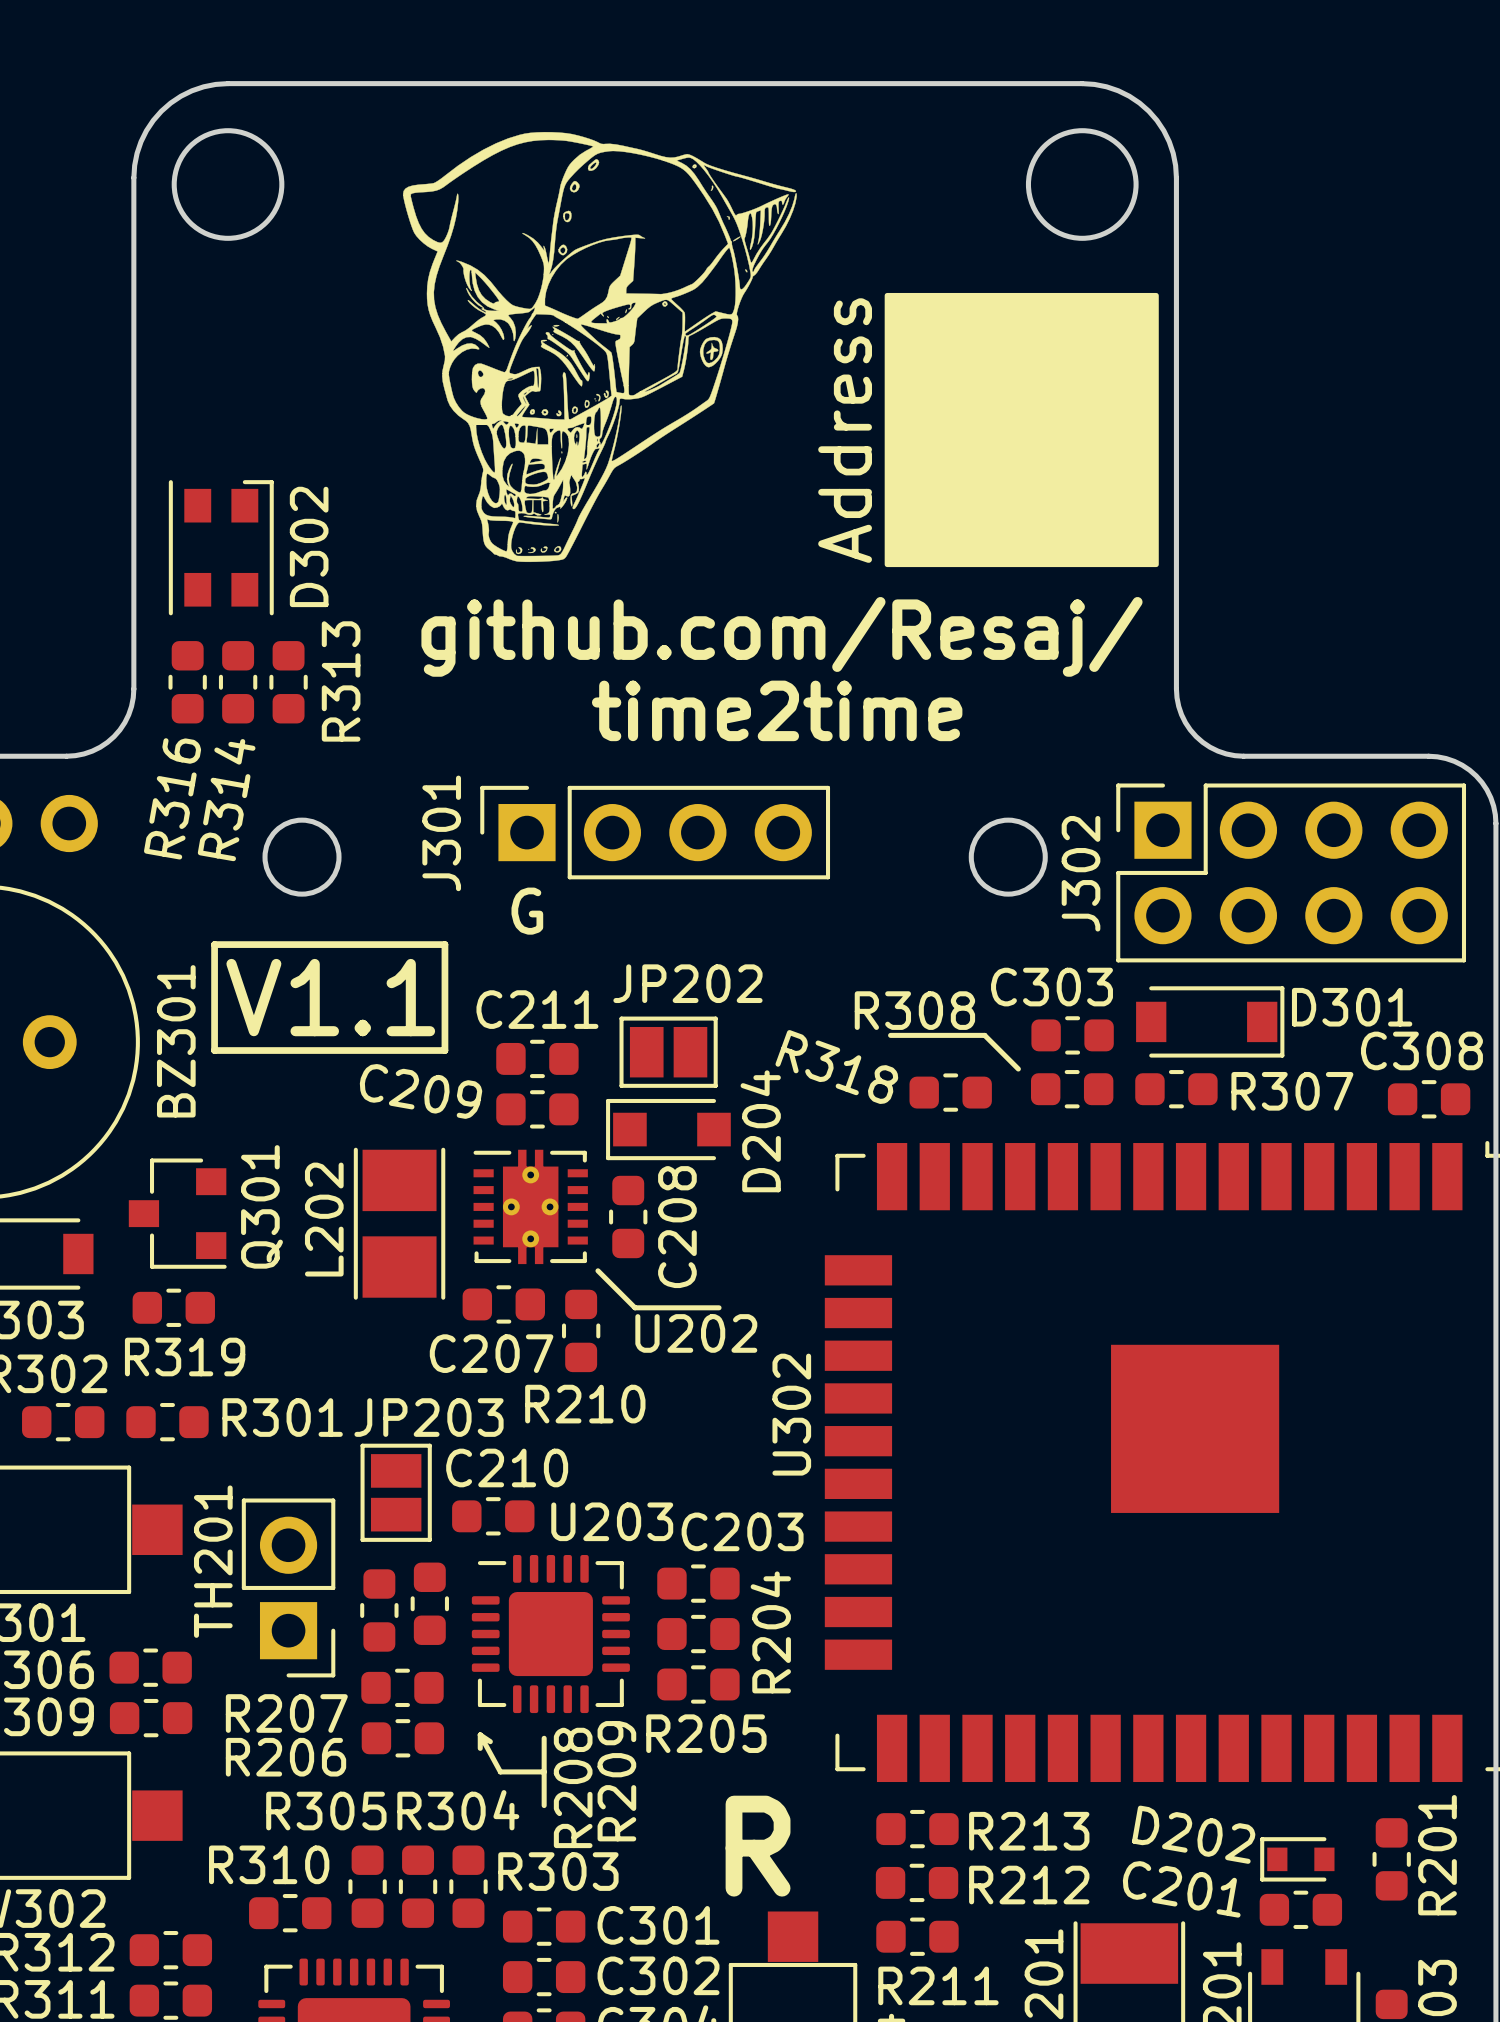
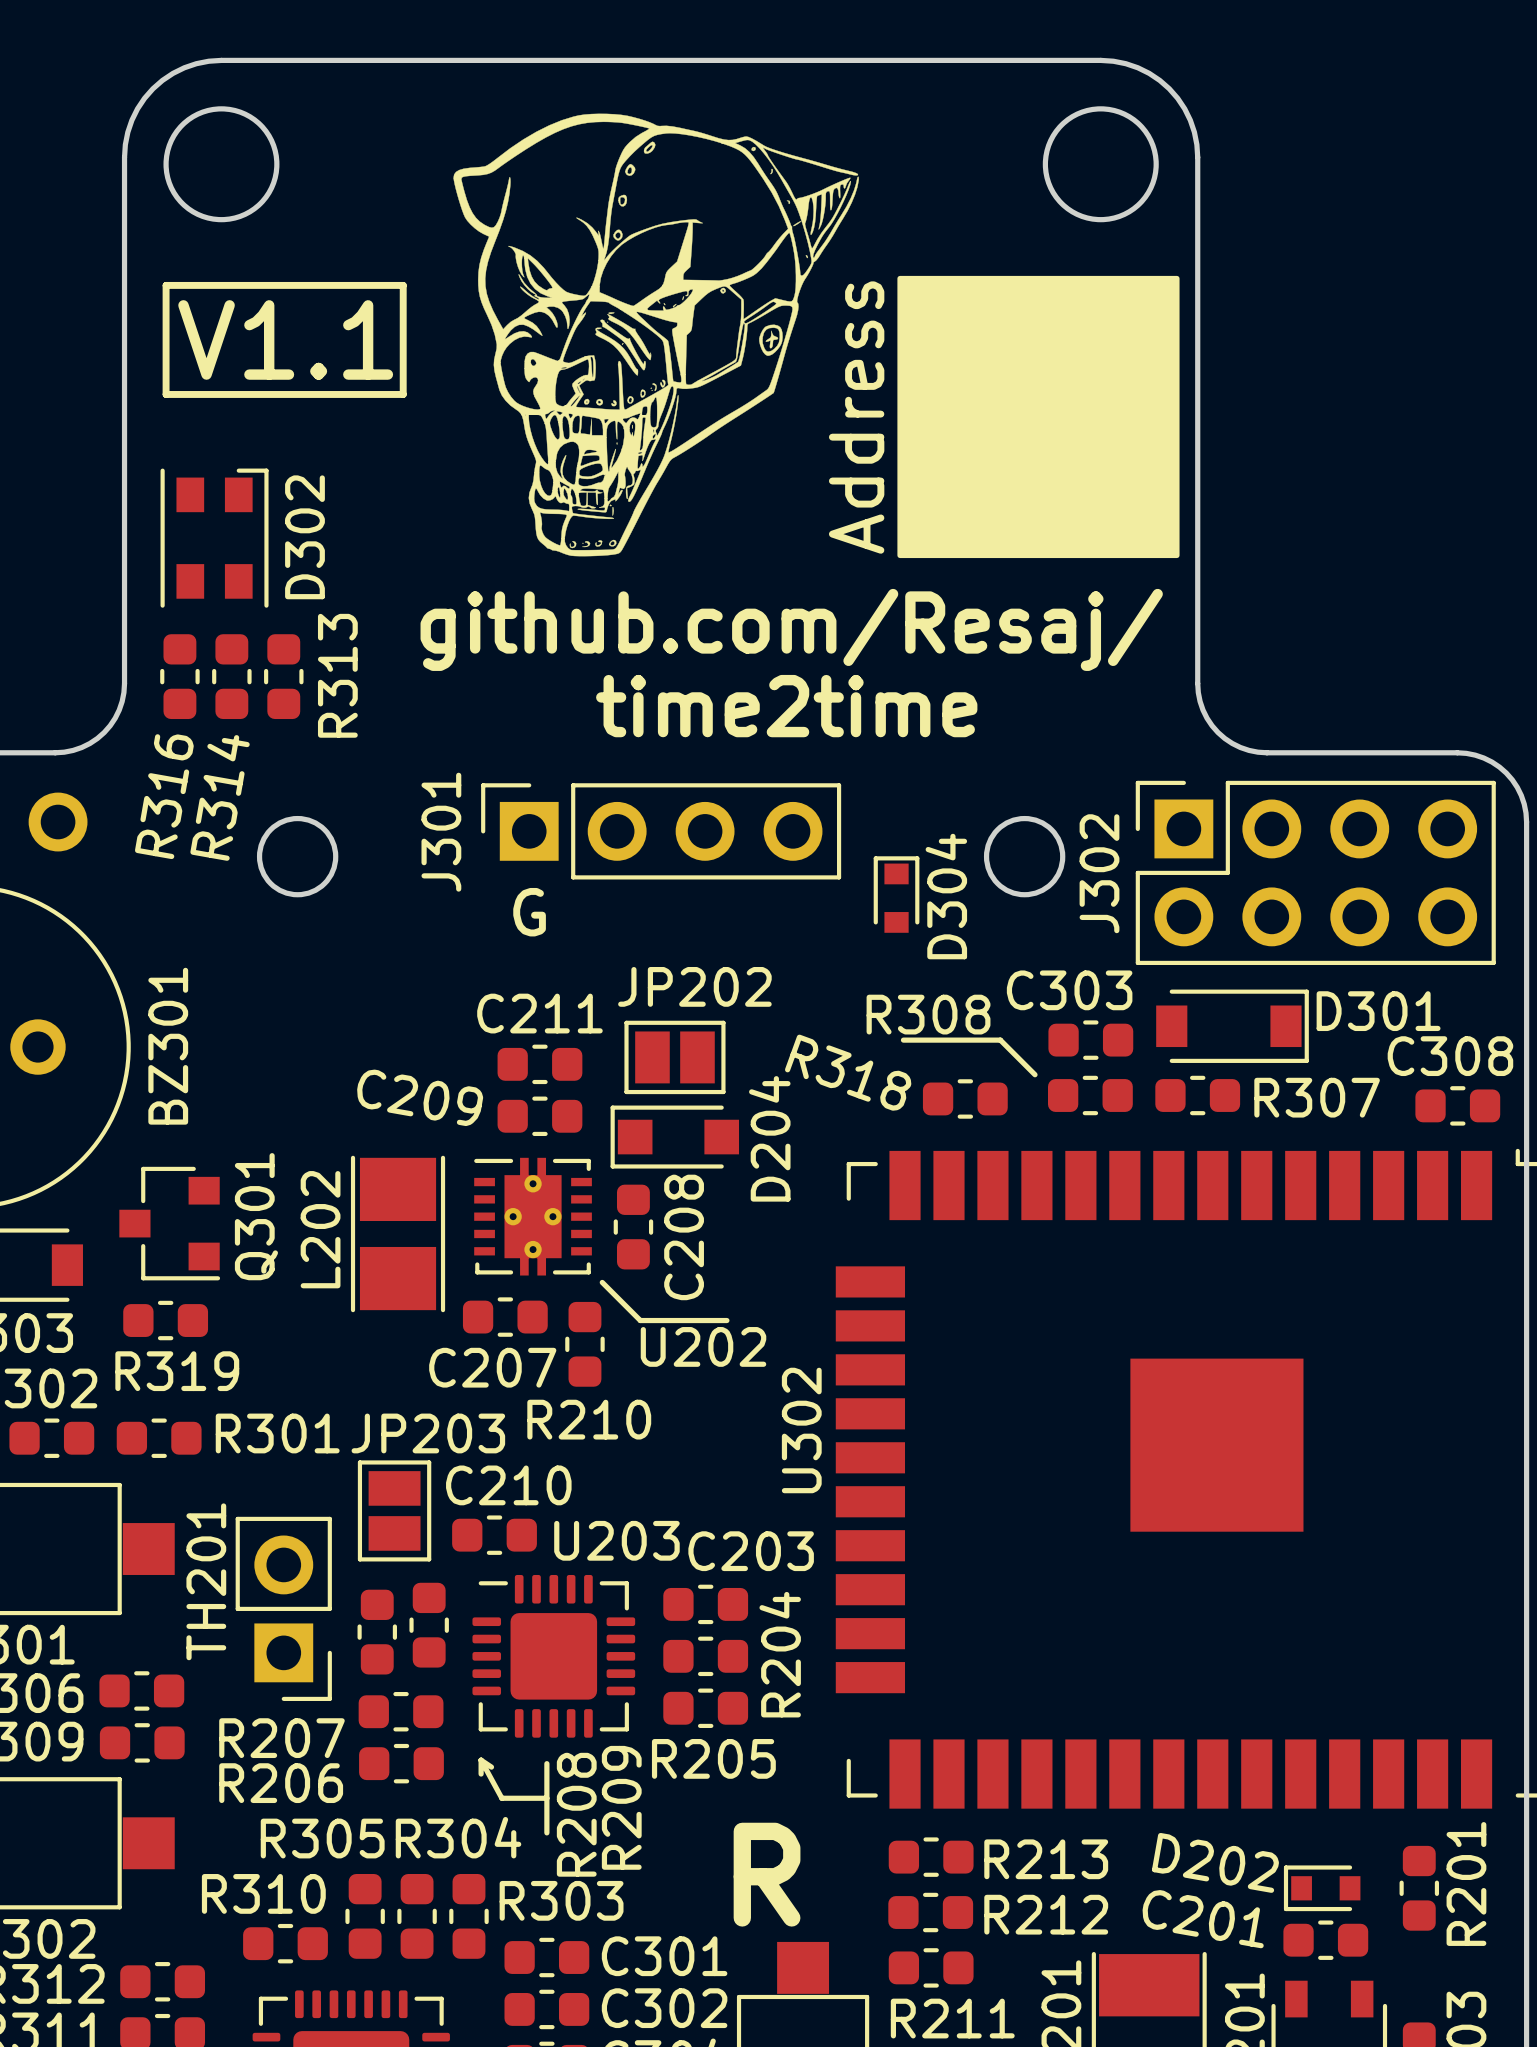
drawing position: (599, 347) -> (656, 334)
D304: none -> (896, 894)
line: (214, 944) (214, 1050) (444, 1050) (444, 944) (214, 944) -> (166, 285) (166, 394) (403, 394) (403, 285) (166, 285)
text position: V1.1 (330, 997) -> V1.1 (285, 339)

